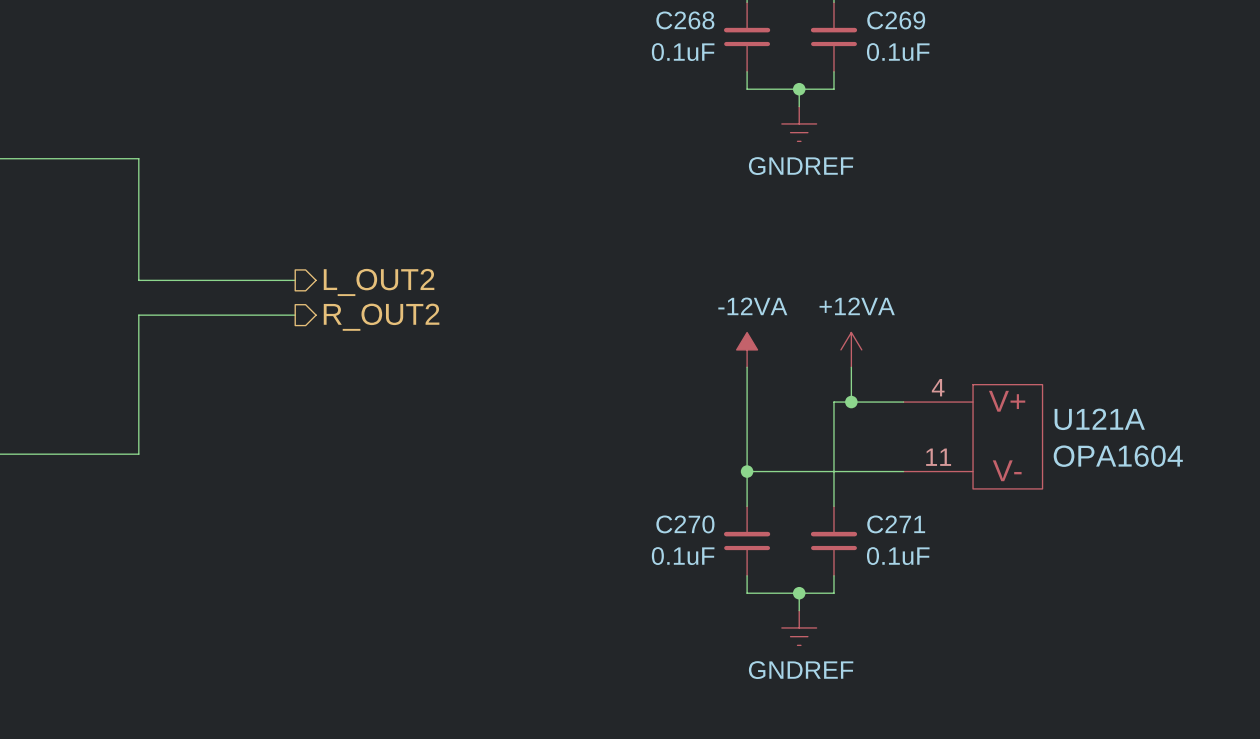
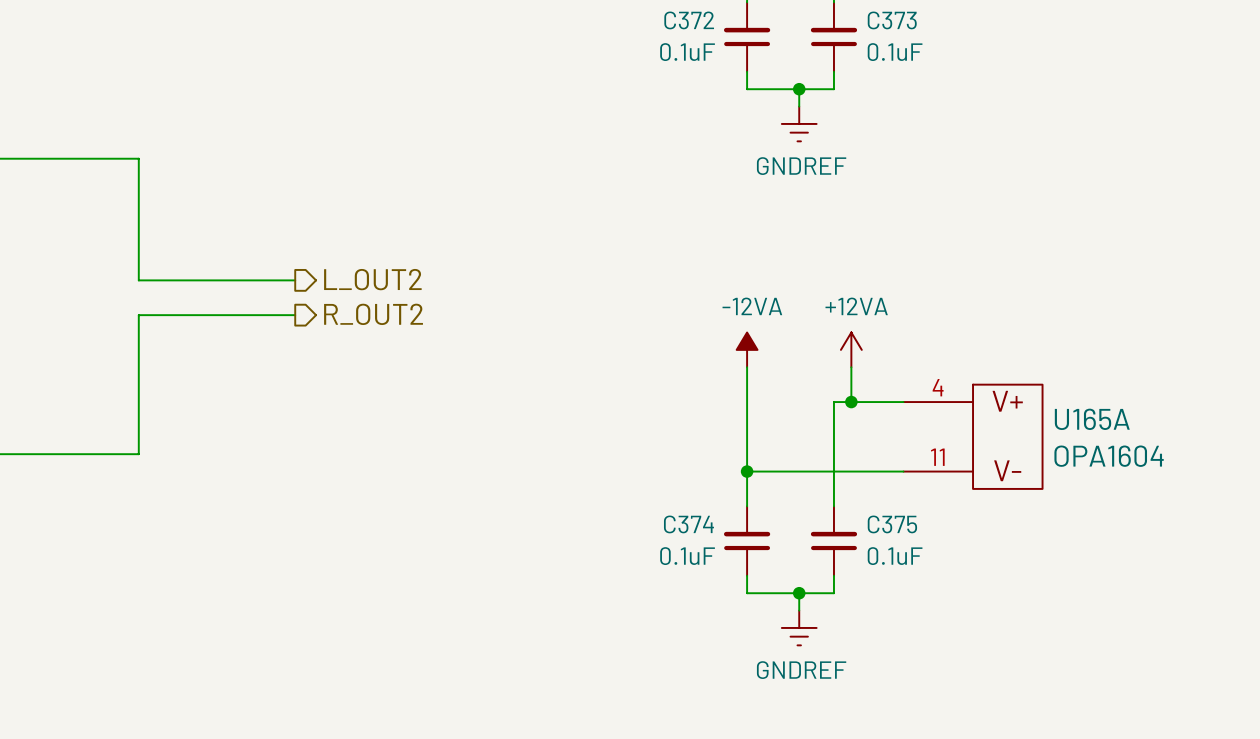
C268 name: C268 (685, 20) -> C372 (689, 20)
C269 name: C269 (896, 20) -> C373 (892, 20)
U121A name: U121A (1099, 419) -> U165A (1092, 419)
C270 name: C270 (685, 524) -> C374 (688, 524)
C271 name: C271 (896, 524) -> C375 (892, 524)

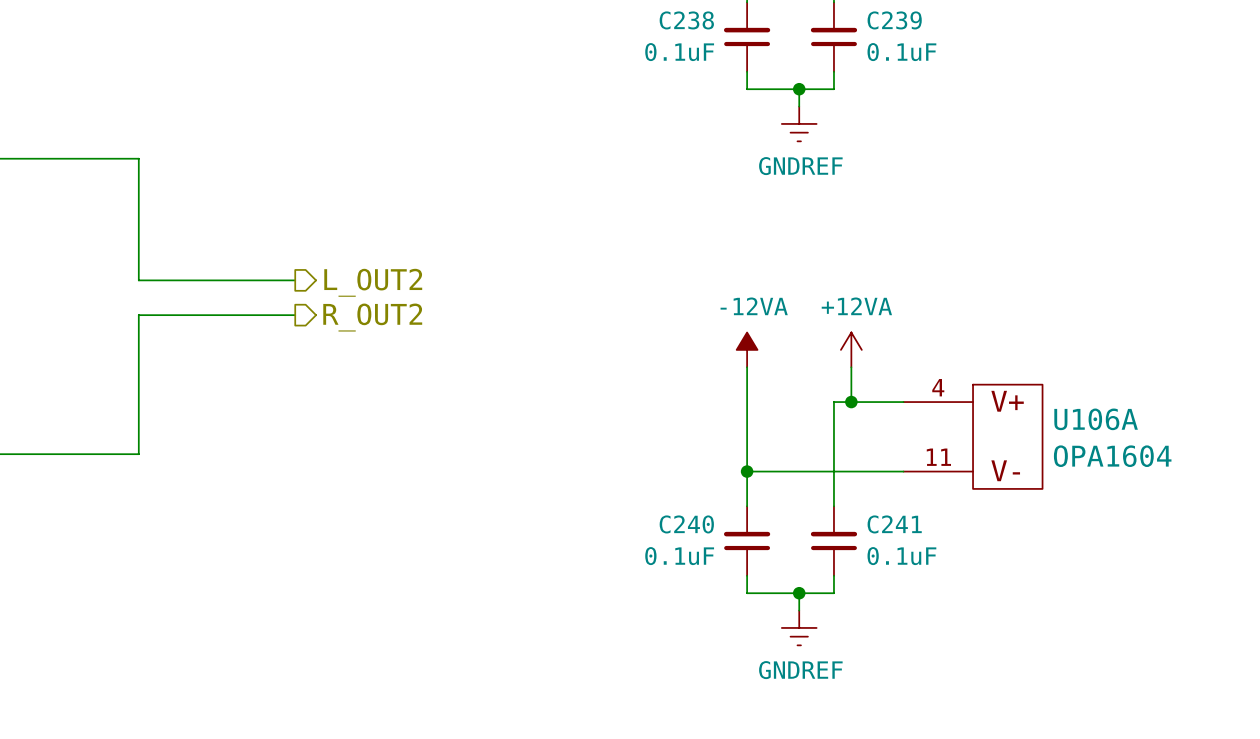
C372 name: C372 (689, 20) -> C238 (686, 20)
C373 name: C373 (892, 20) -> C239 (894, 20)
U165A name: U165A (1092, 419) -> U106A (1096, 419)
C374 name: C374 (688, 524) -> C240 (686, 524)
C375 name: C375 (892, 524) -> C241 (894, 524)

